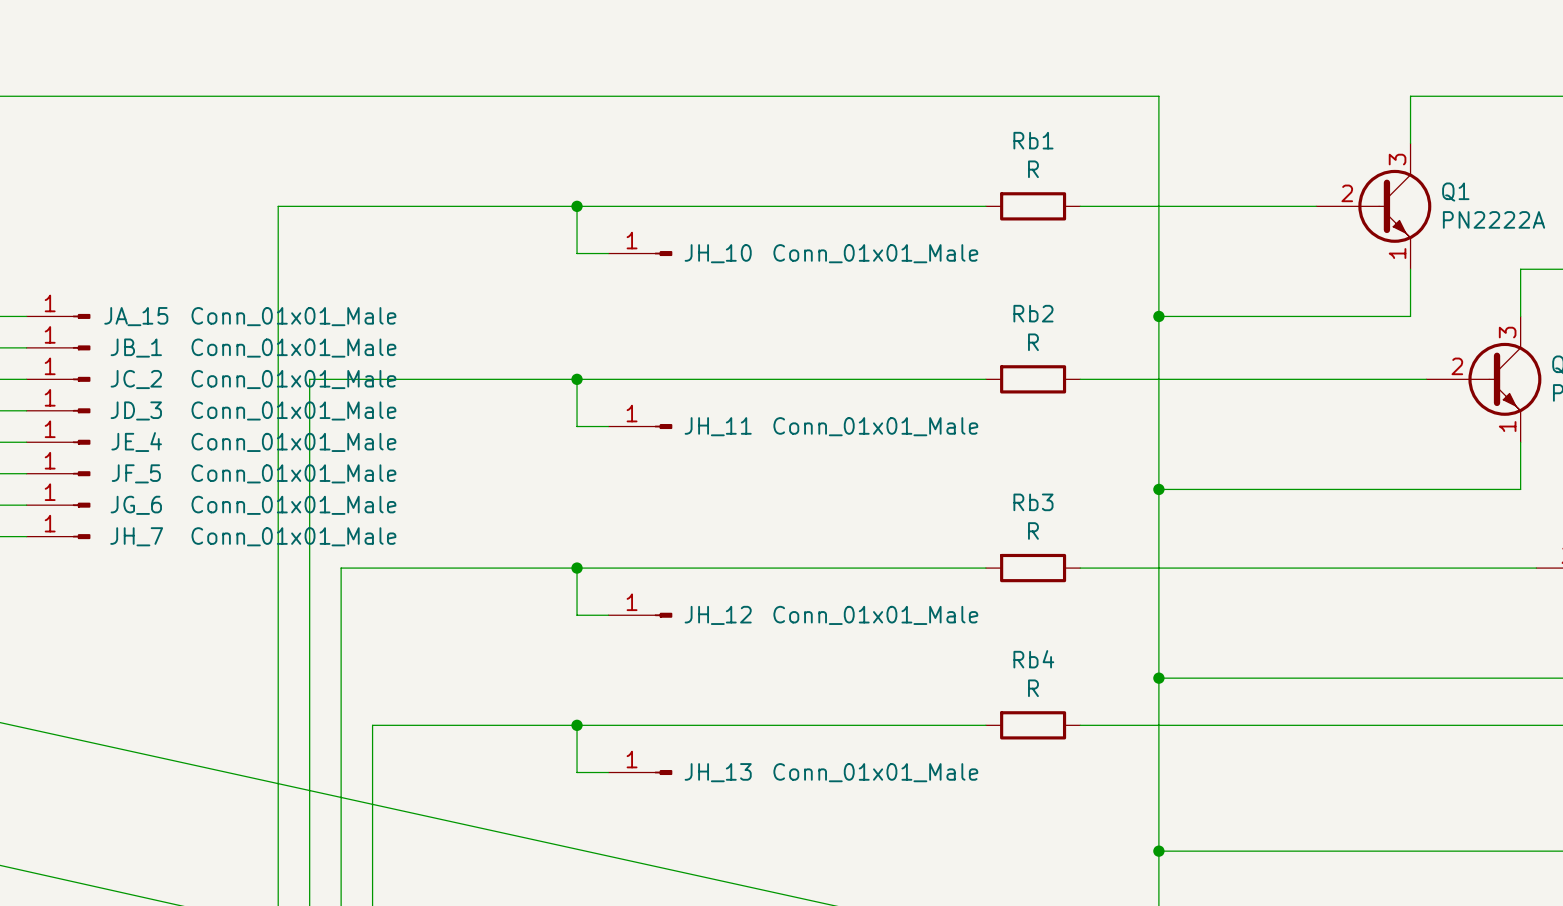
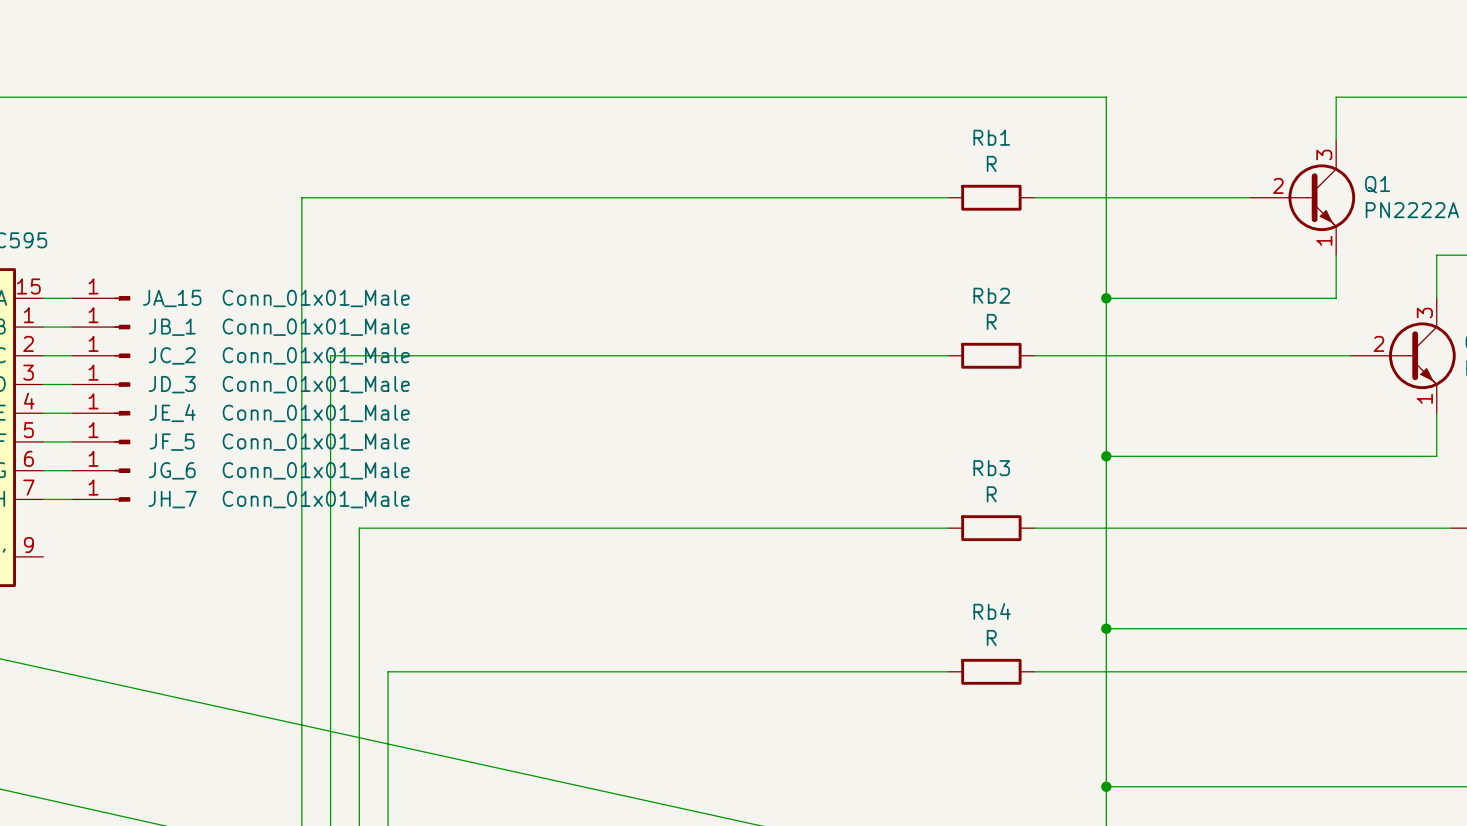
wire: (577, 206) (577, 253) (608, 253) -> none
junction: (577, 206) -> none
JH_10: Conn_01x01_Male (640, 253) -> none
wire: (577, 379) (577, 426) (608, 426) -> none
junction: (577, 379) -> none
JH_11: Conn_01x01_Male (640, 426) -> none
wire: (577, 568) (577, 615) (608, 615) -> none
junction: (577, 568) -> none
JH_12: Conn_01x01_Male (640, 615) -> none
wire: (577, 725) (577, 772) (608, 772) -> none
junction: (577, 725) -> none
JH_13: Conn_01x01_Male (640, 772) -> none

